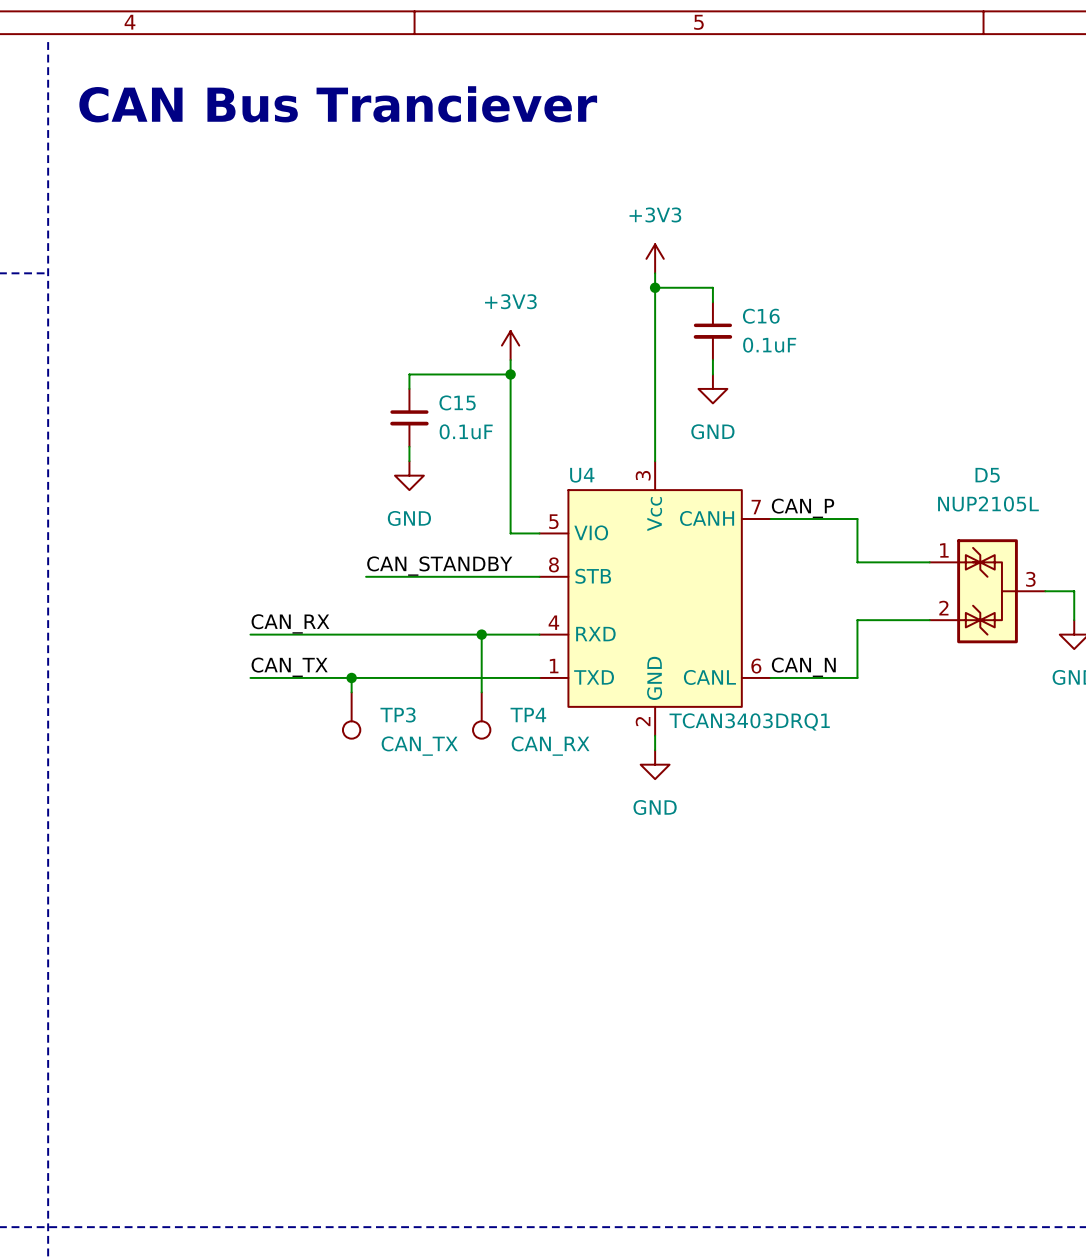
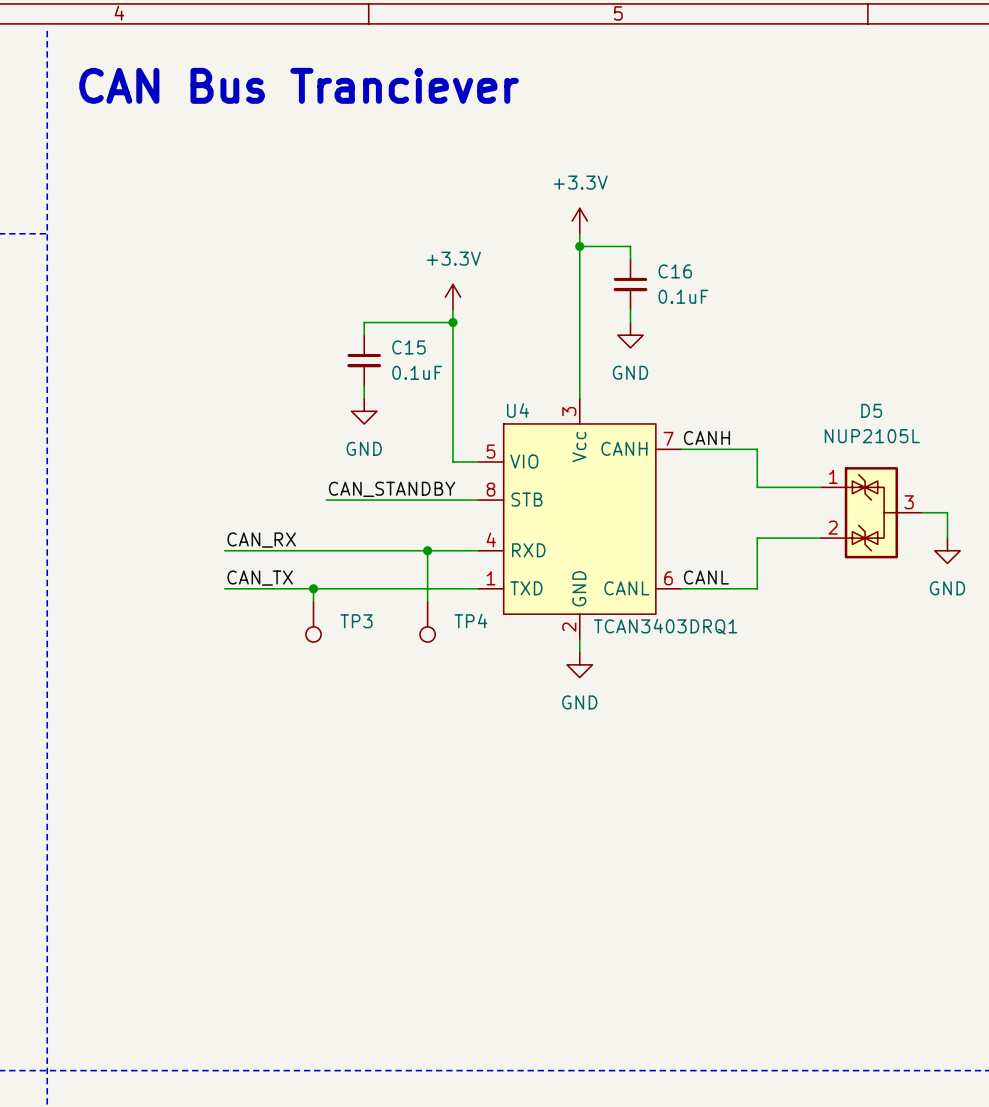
power symbol: +3V3 (655, 258) -> +3.3V (579, 221)
power symbol: +3V3 (510, 345) -> +3.3V (452, 297)
label: CAN_P (803, 508) -> CANH (706, 438)
label: CAN_N (803, 667) -> CANL (706, 577)
TP3 value: CAN_TX (419, 746) -> none
TP4 value: CAN_RX (550, 746) -> none

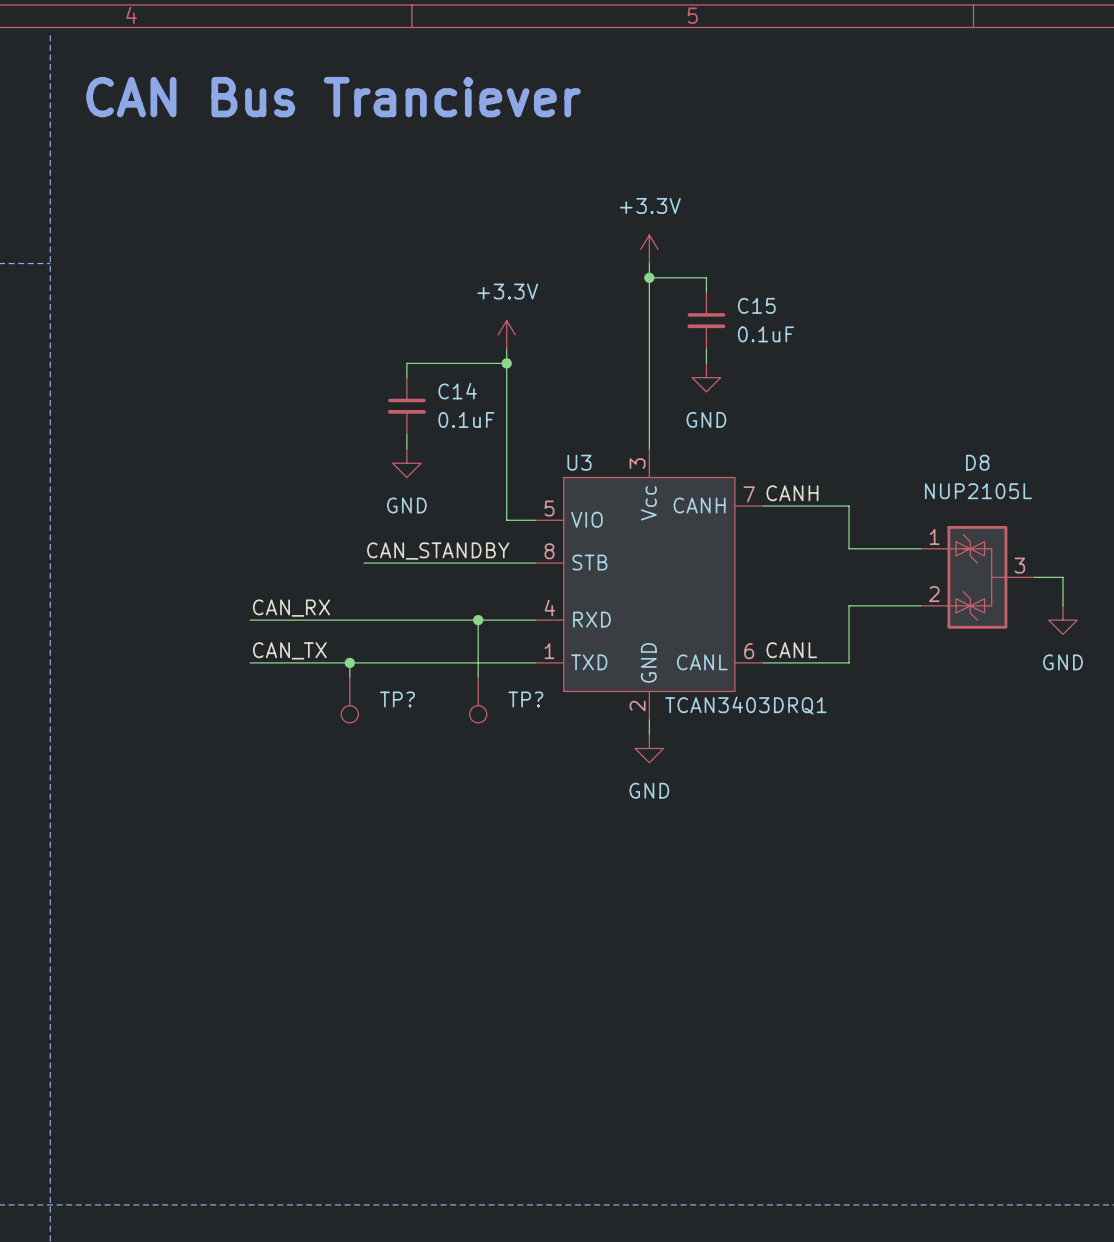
C16 name: C16 (675, 271) -> C15 (756, 305)
C15 name: C15 (409, 347) -> C14 (457, 391)
U4 name: U4 (517, 410) -> U3 (579, 462)
D5 name: D5 (871, 410) -> D8 (977, 462)
TP4 name: TP4 (470, 620) -> TP? (525, 699)
TP3 name: TP3 (356, 621) -> TP? (397, 699)

